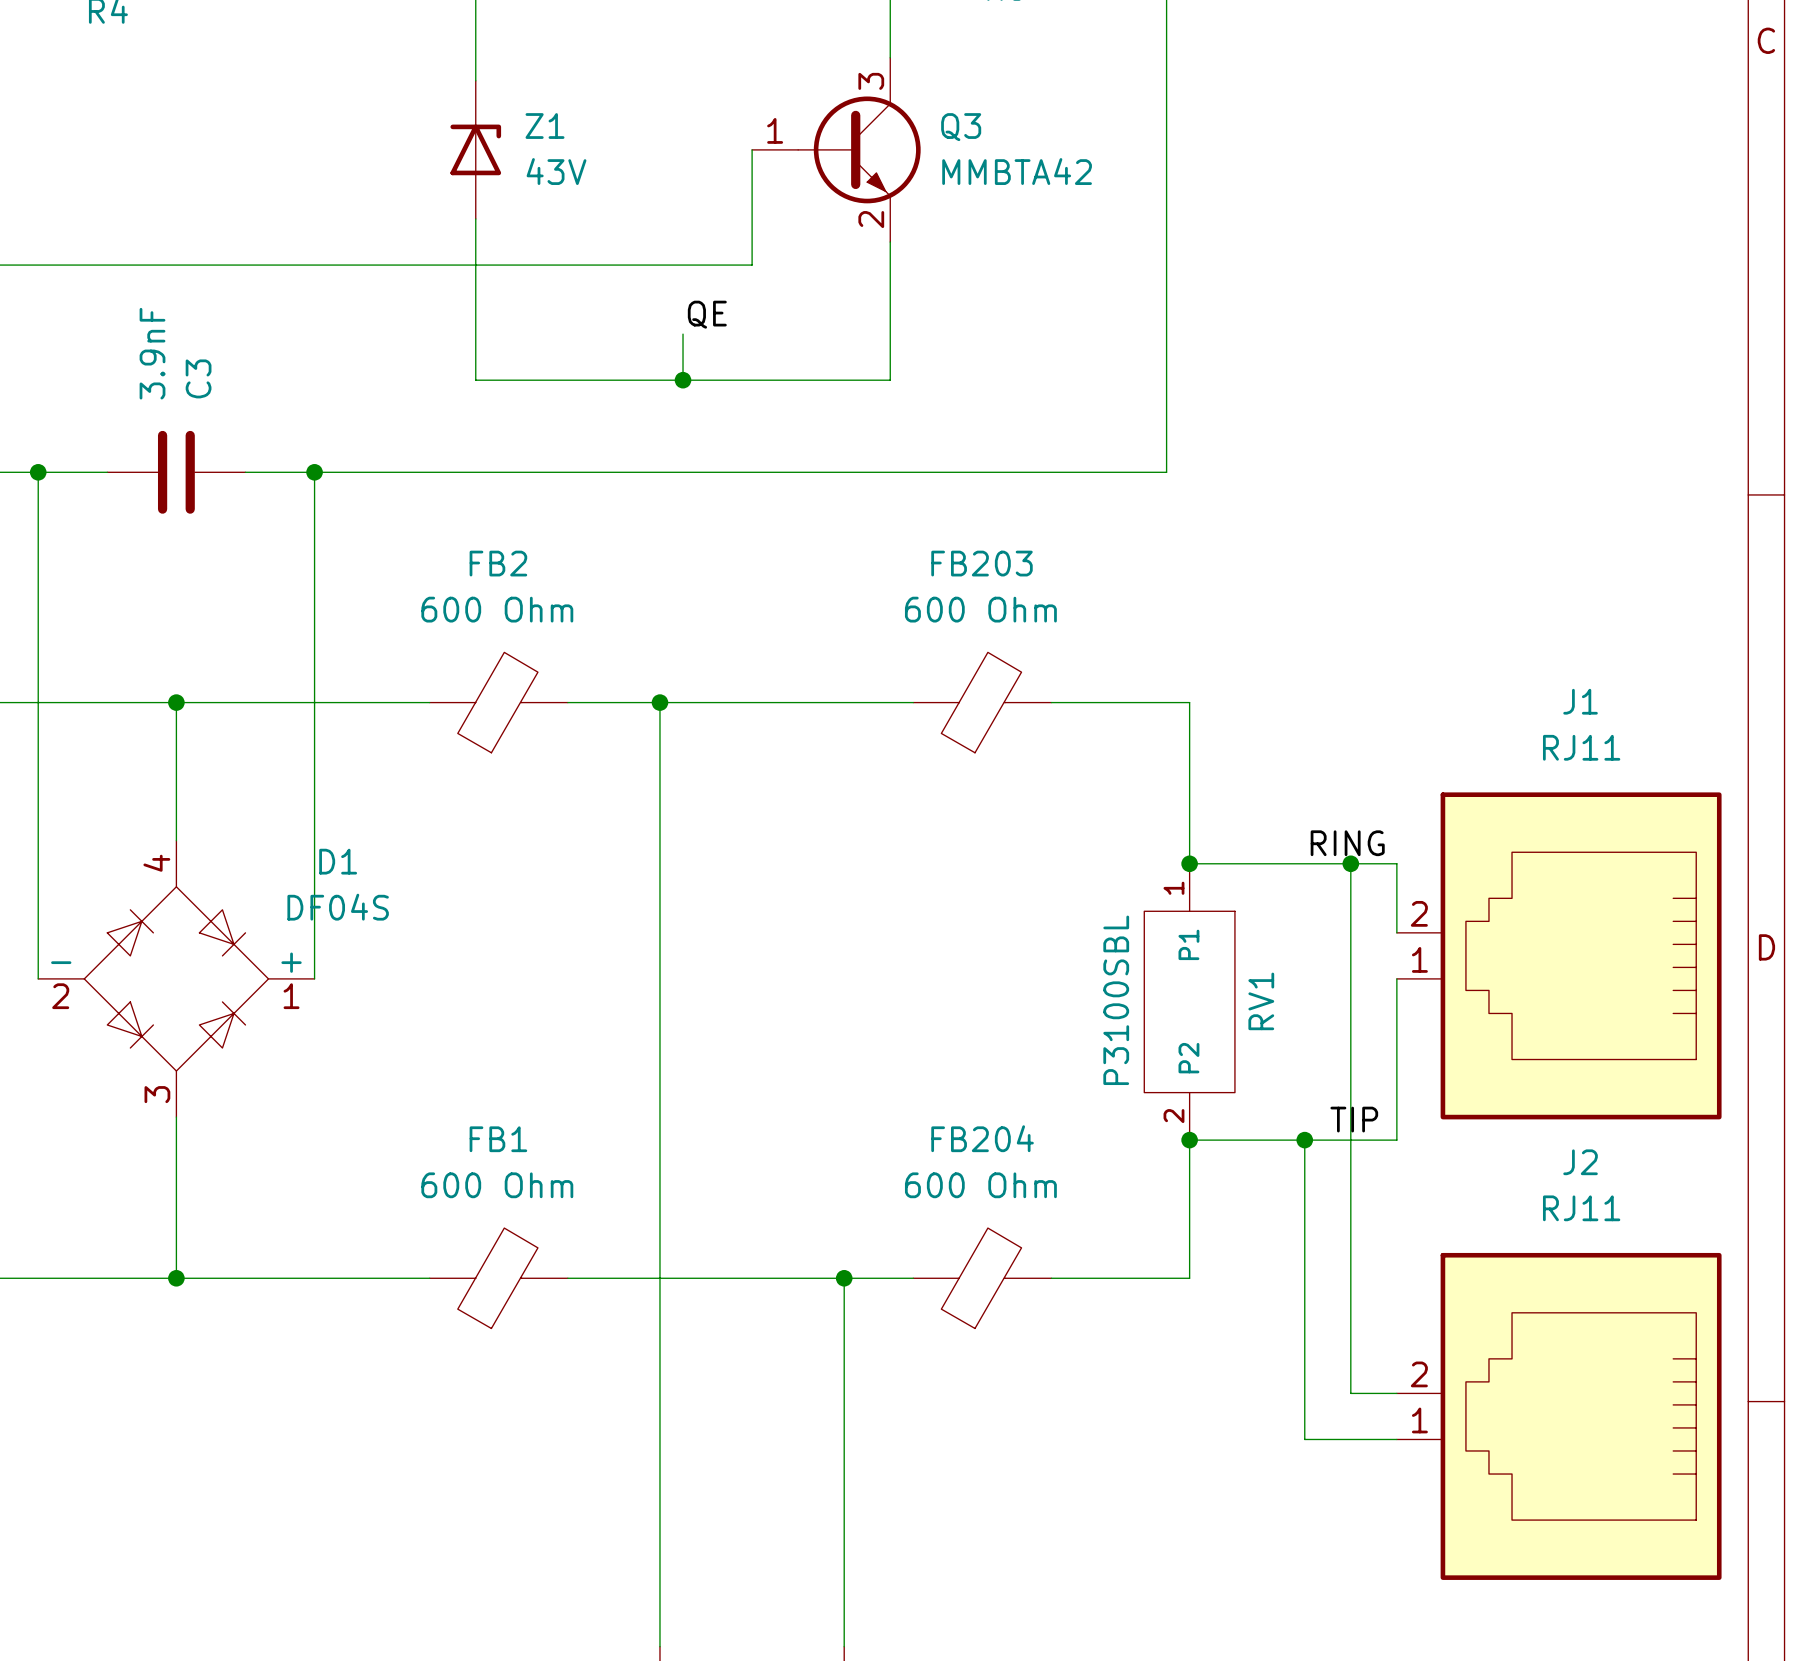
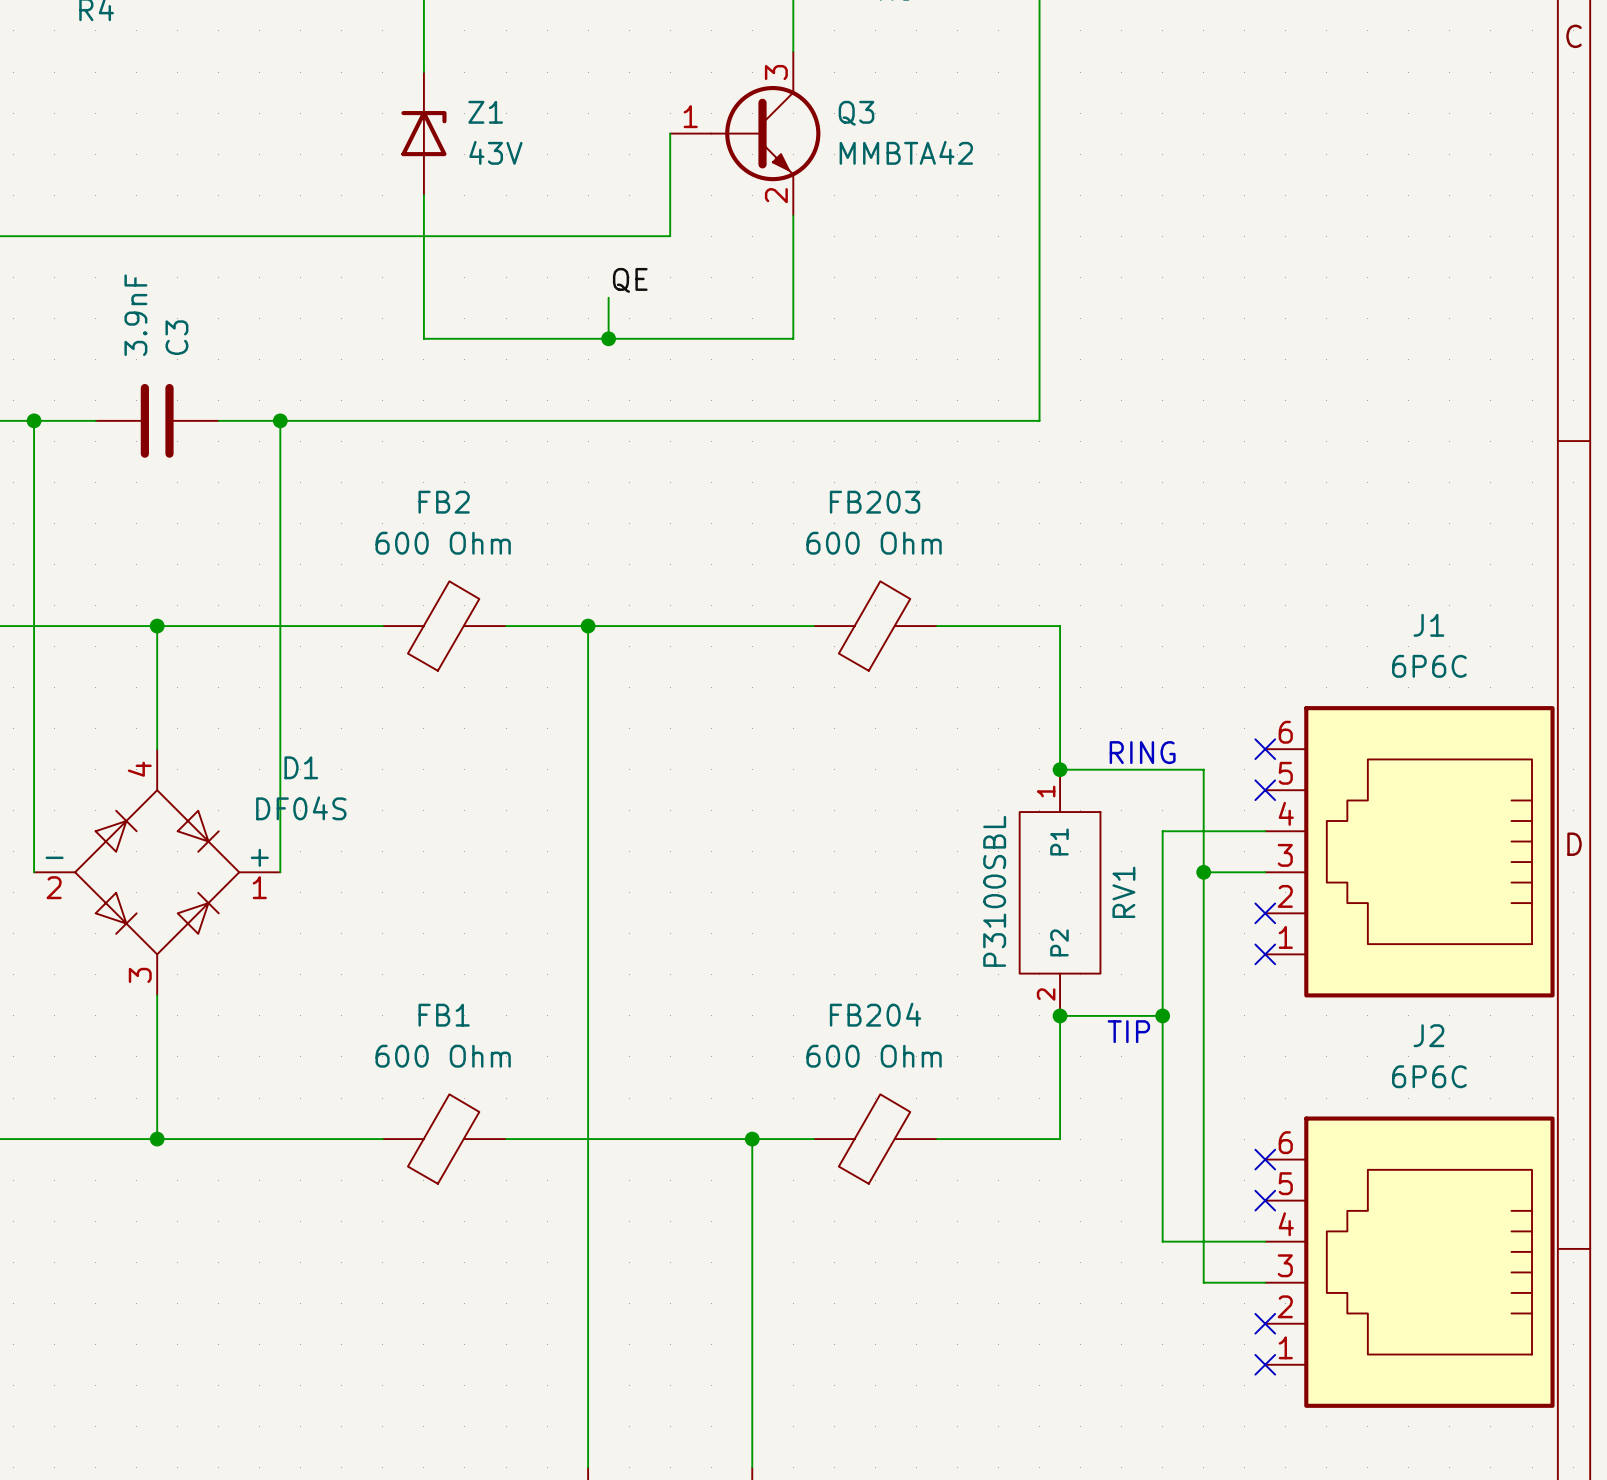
J1 value: RJ11 (1581, 747) -> 6P6C (1429, 666)
J1 symbol: [1396, 792, 1722, 1120] -> [1265, 706, 1555, 998]
no-connect mark: none -> (1265, 749)
label: RING (1347, 843) -> none
text: none -> RING (1142, 752)
wire: (1350, 863) (1396, 863) (1396, 932) -> none
junction: (1350, 863) -> none
no-connect mark: none -> (1265, 790)
wire: none -> (1203, 872) (1265, 872)
junction: none -> (1203, 872)
wire: (1396, 978) (1396, 1140) (1304, 1140) -> (1265, 831) (1162, 831) (1162, 1015)
no-connect mark: none -> (1265, 913)
no-connect mark: none -> (1265, 954)
label: TIP (1354, 1119) -> none
text: none -> TIP (1128, 1031)
J2 value: RJ11 (1581, 1208) -> 6P6C (1429, 1076)
J2 symbol: [1396, 1252, 1722, 1580] -> [1265, 1116, 1555, 1408]
no-connect mark: none -> (1265, 1159)
no-connect mark: none -> (1265, 1200)
wire: (1304, 1393) (1304, 1439) (1350, 1439) -> (1162, 1241) (1203, 1241) (1203, 1282)
no-connect mark: none -> (1265, 1323)
no-connect mark: none -> (1265, 1364)

